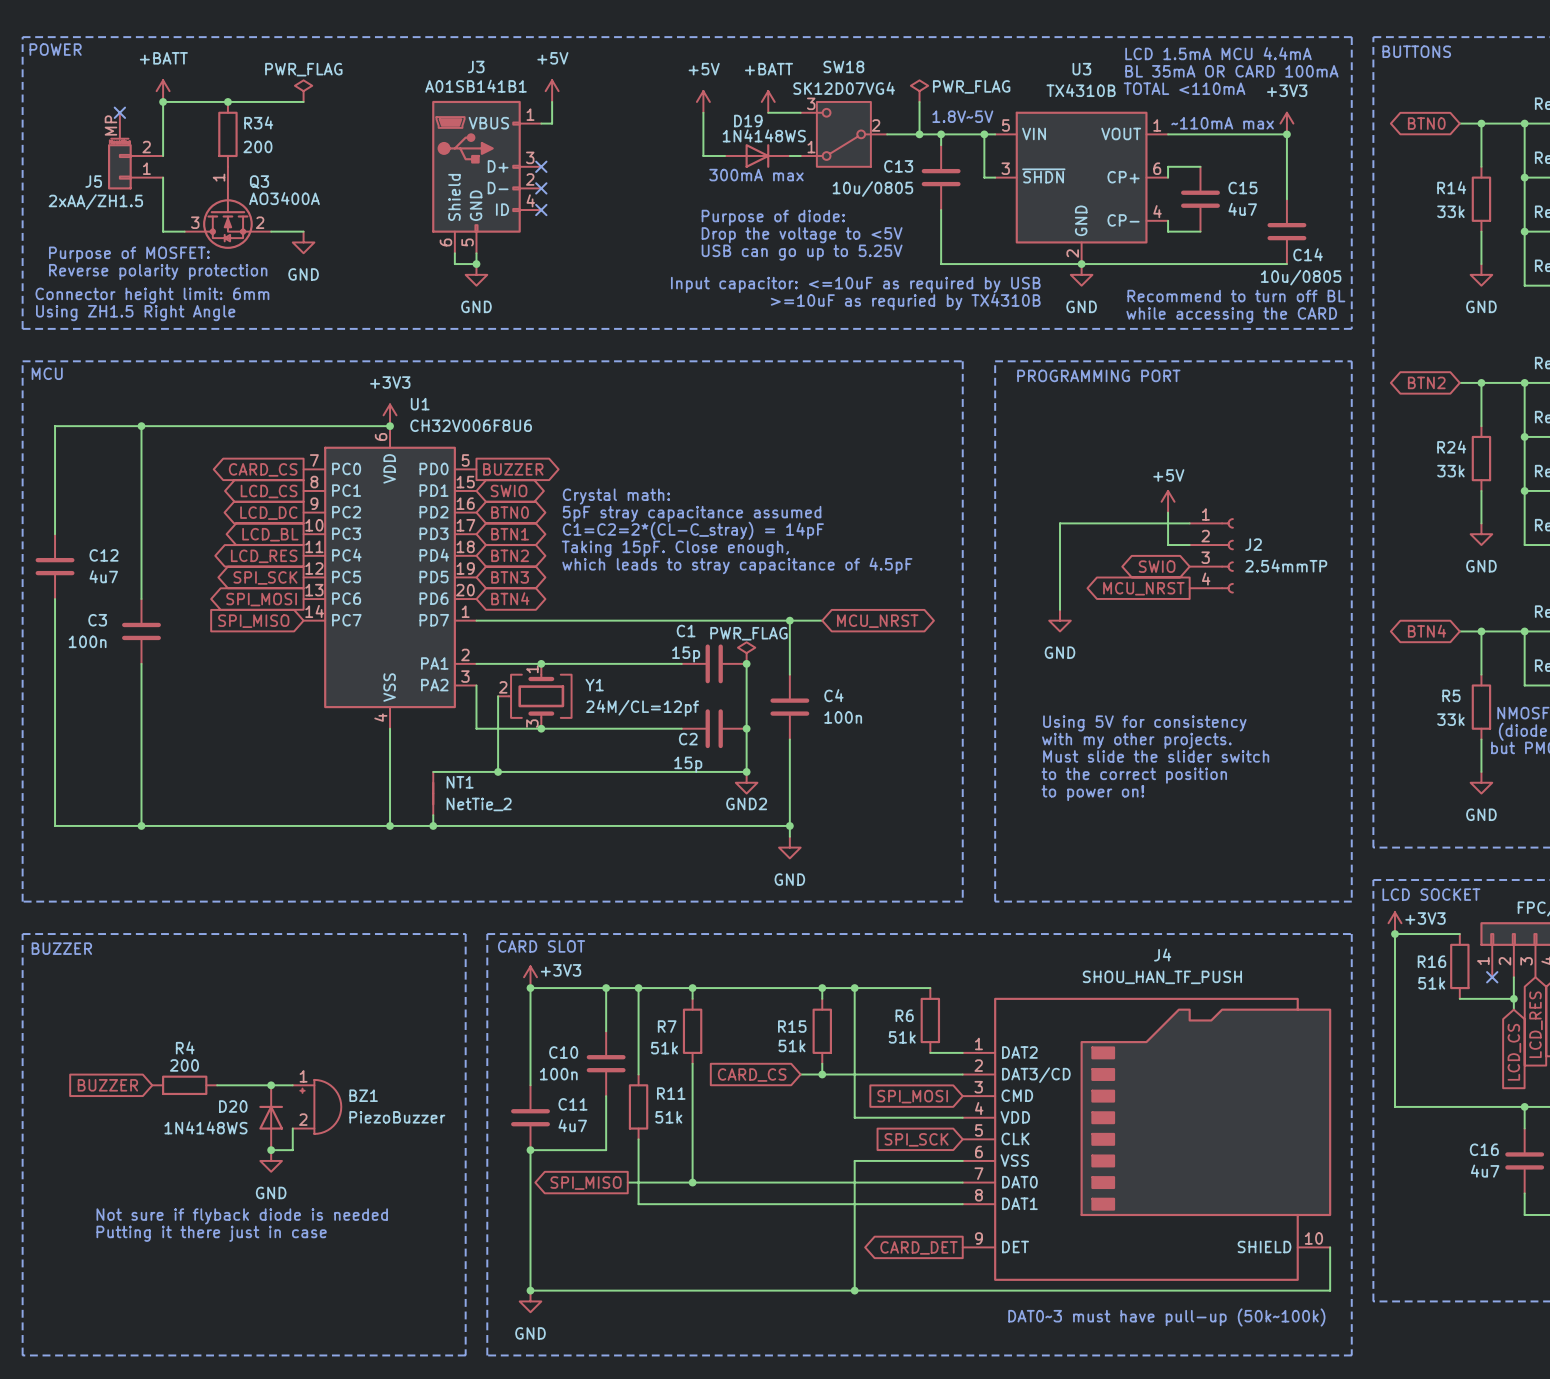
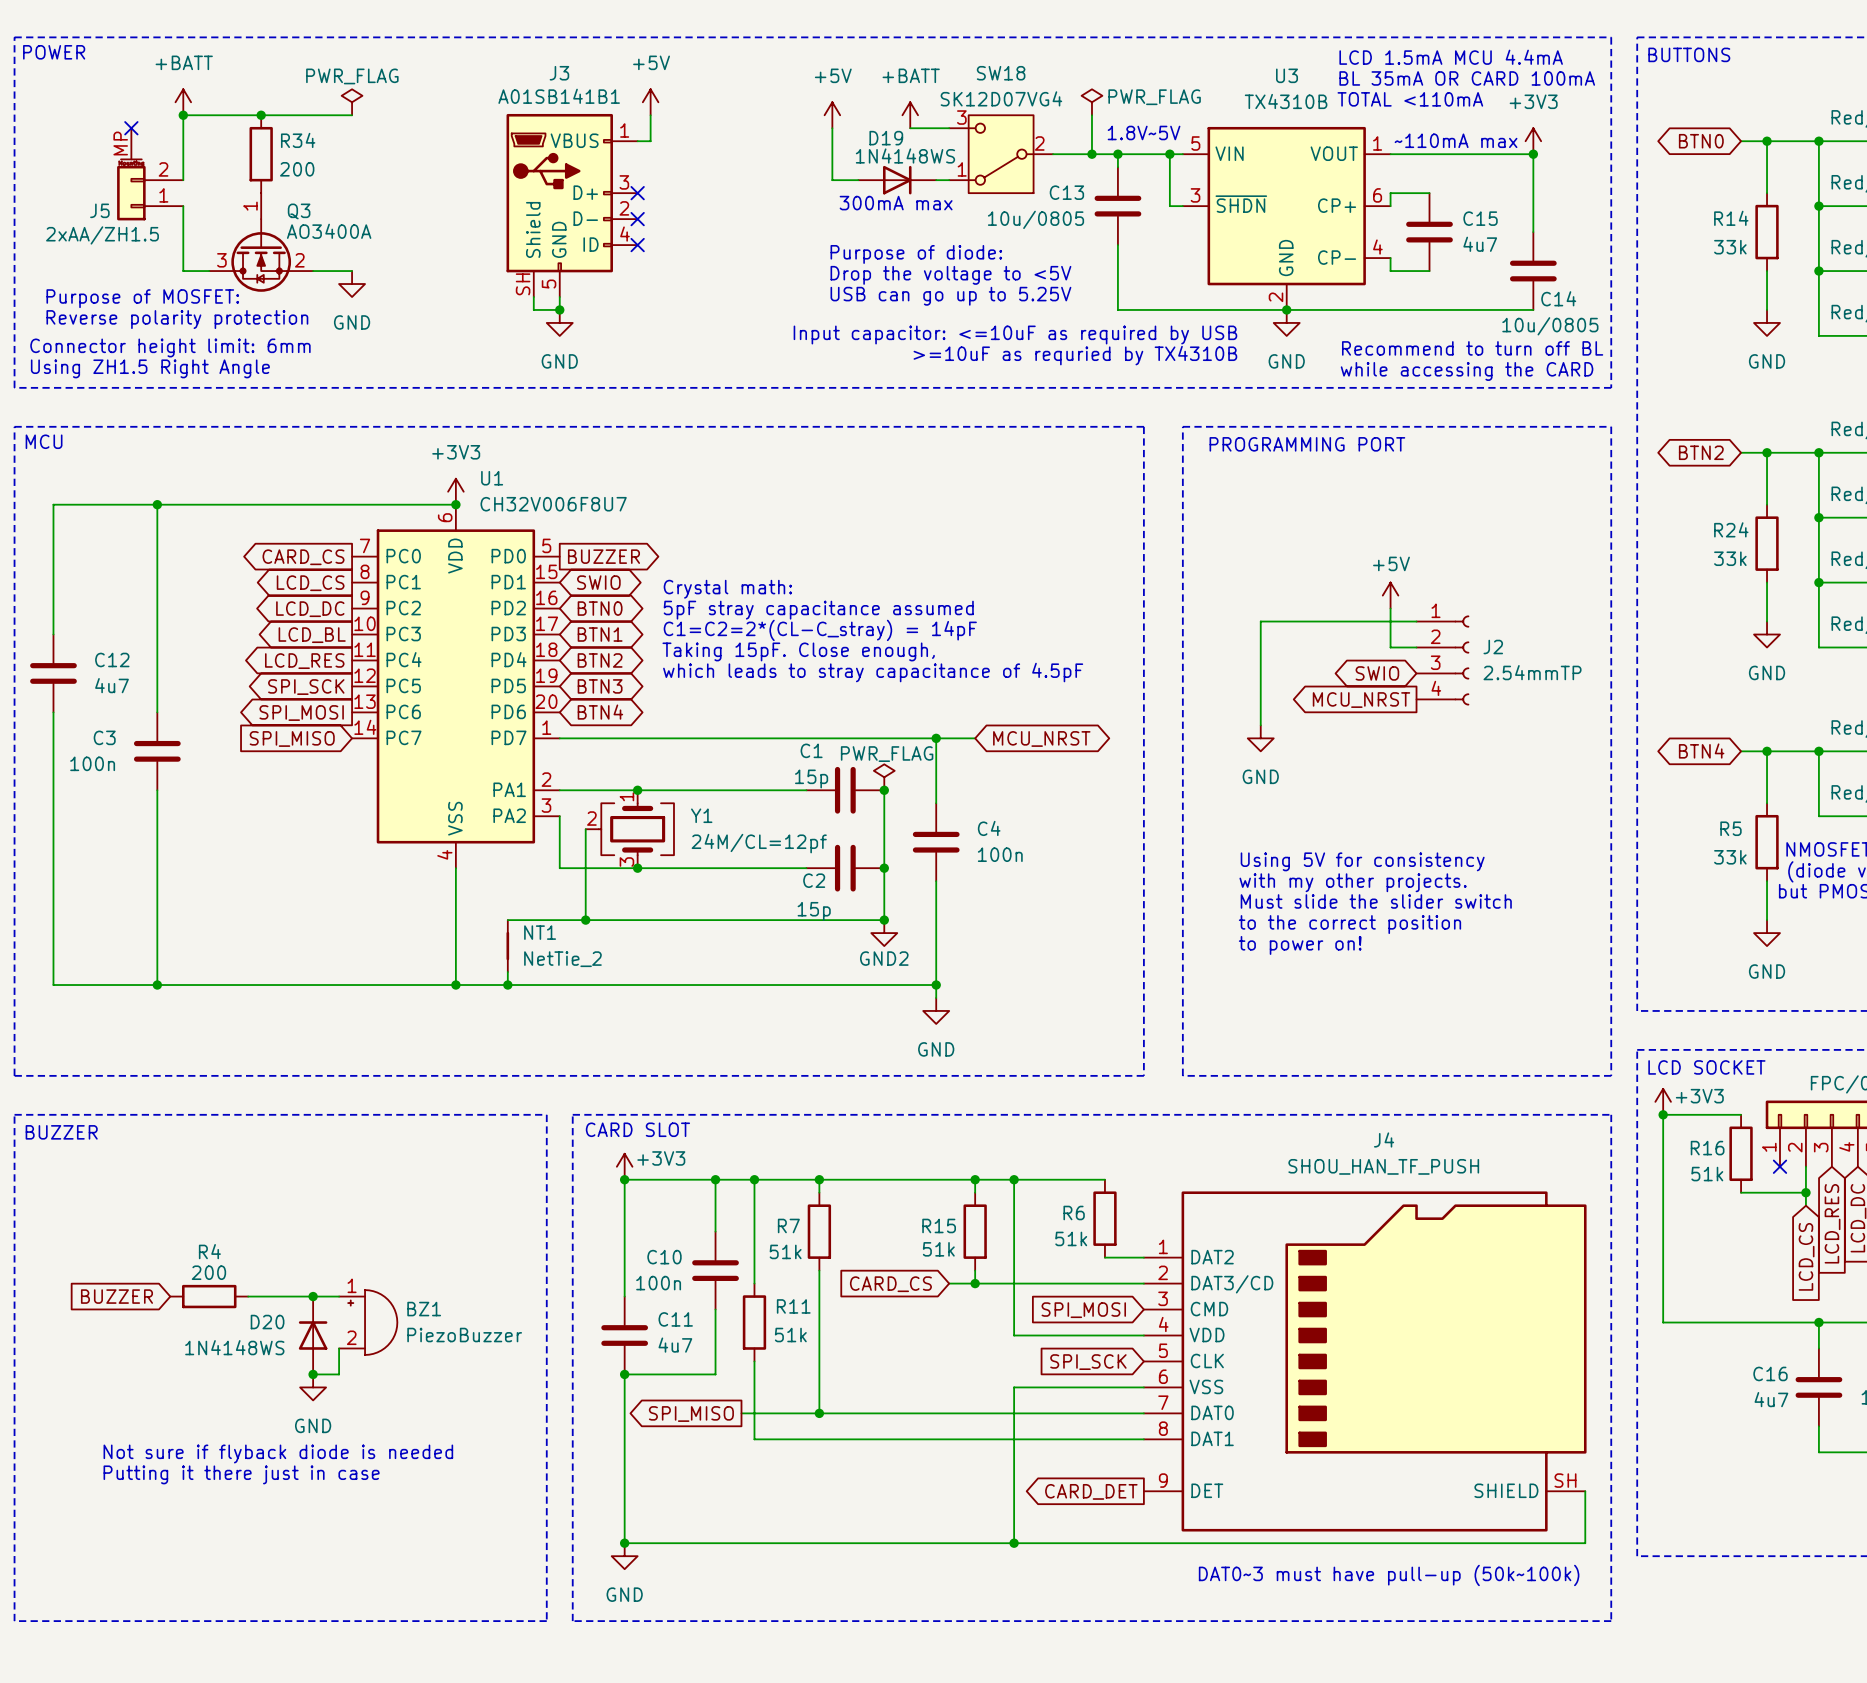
J3 pin number: 6 (445, 242) -> SH (523, 284)
U1 value: CH32V006F8U6 (471, 425) -> CH32V006F8U7 (553, 504)
J4 pin number: 10 (1313, 1238) -> SH (1565, 1480)

